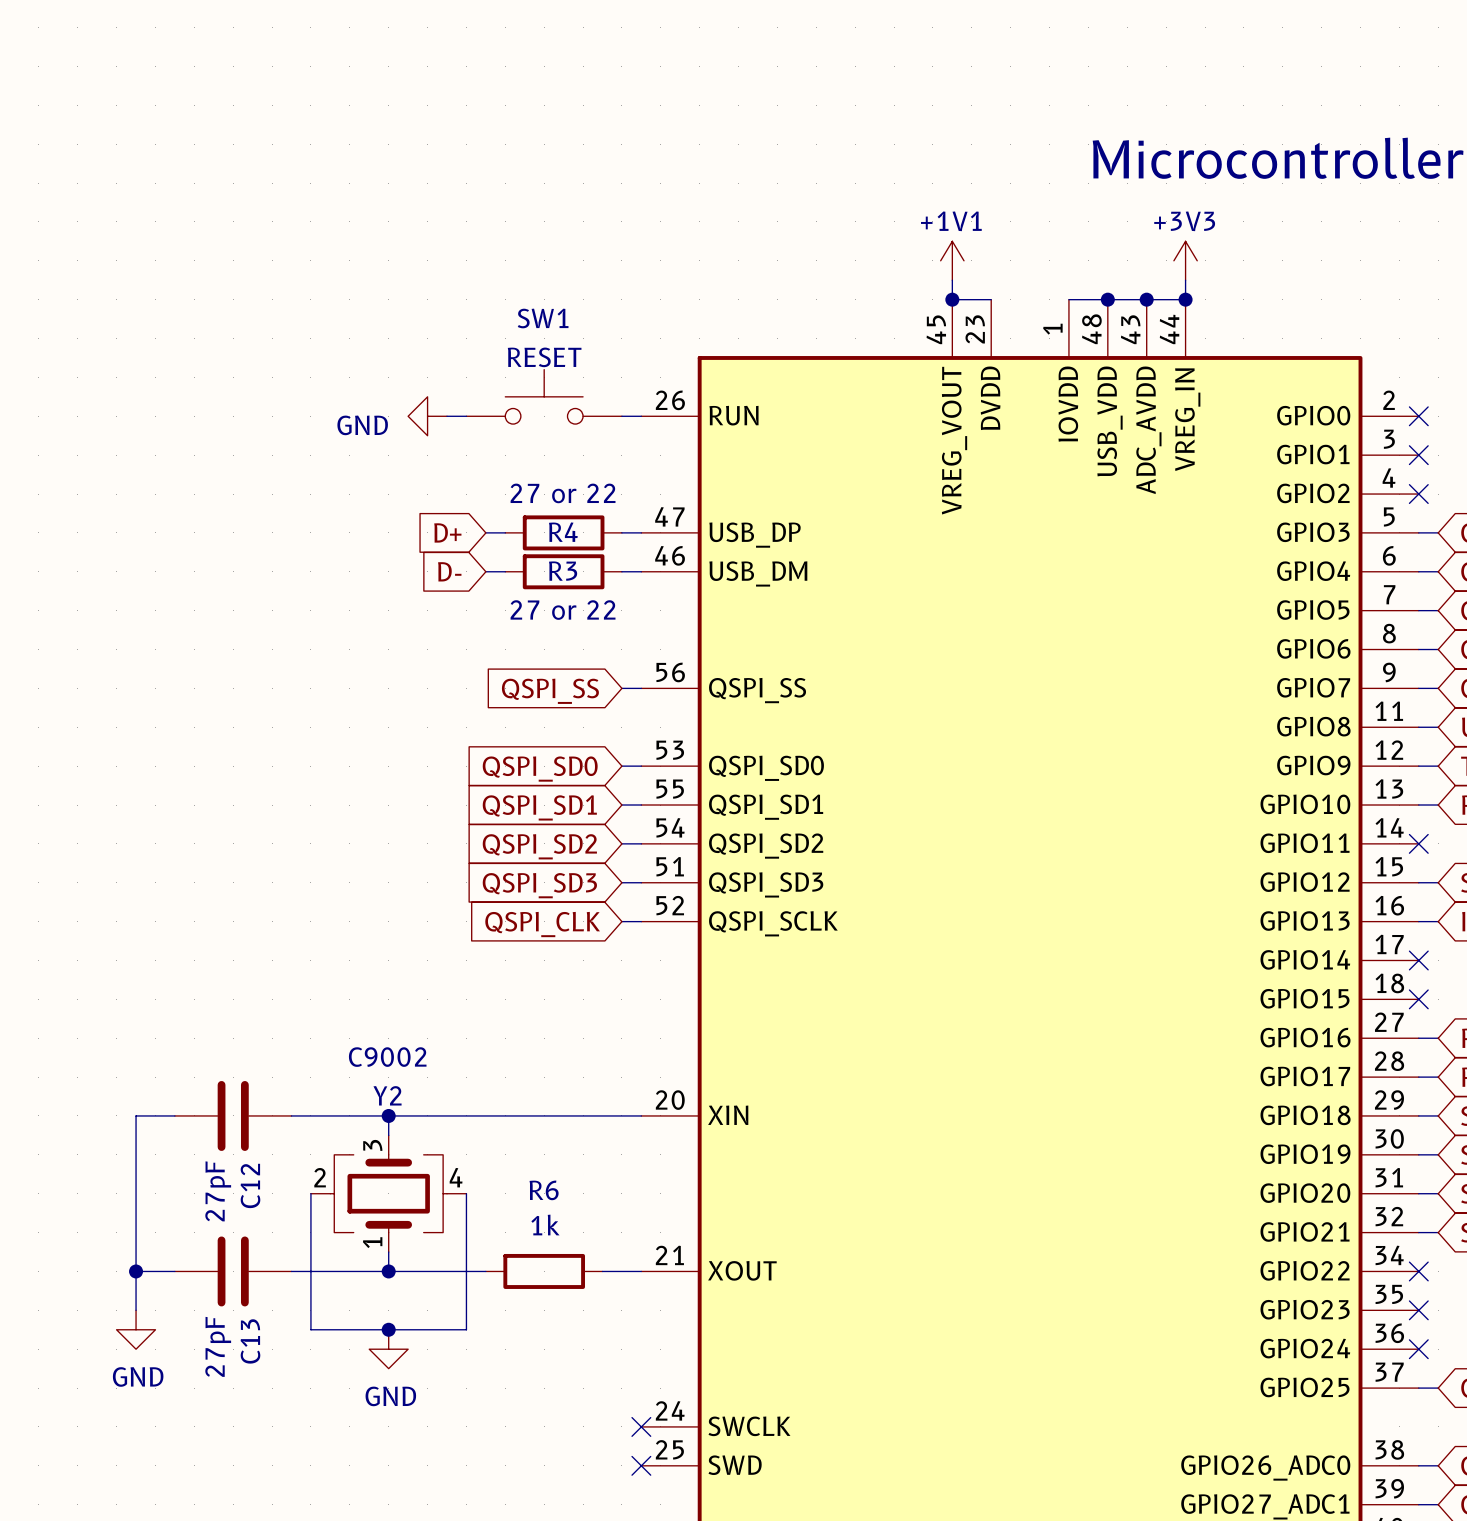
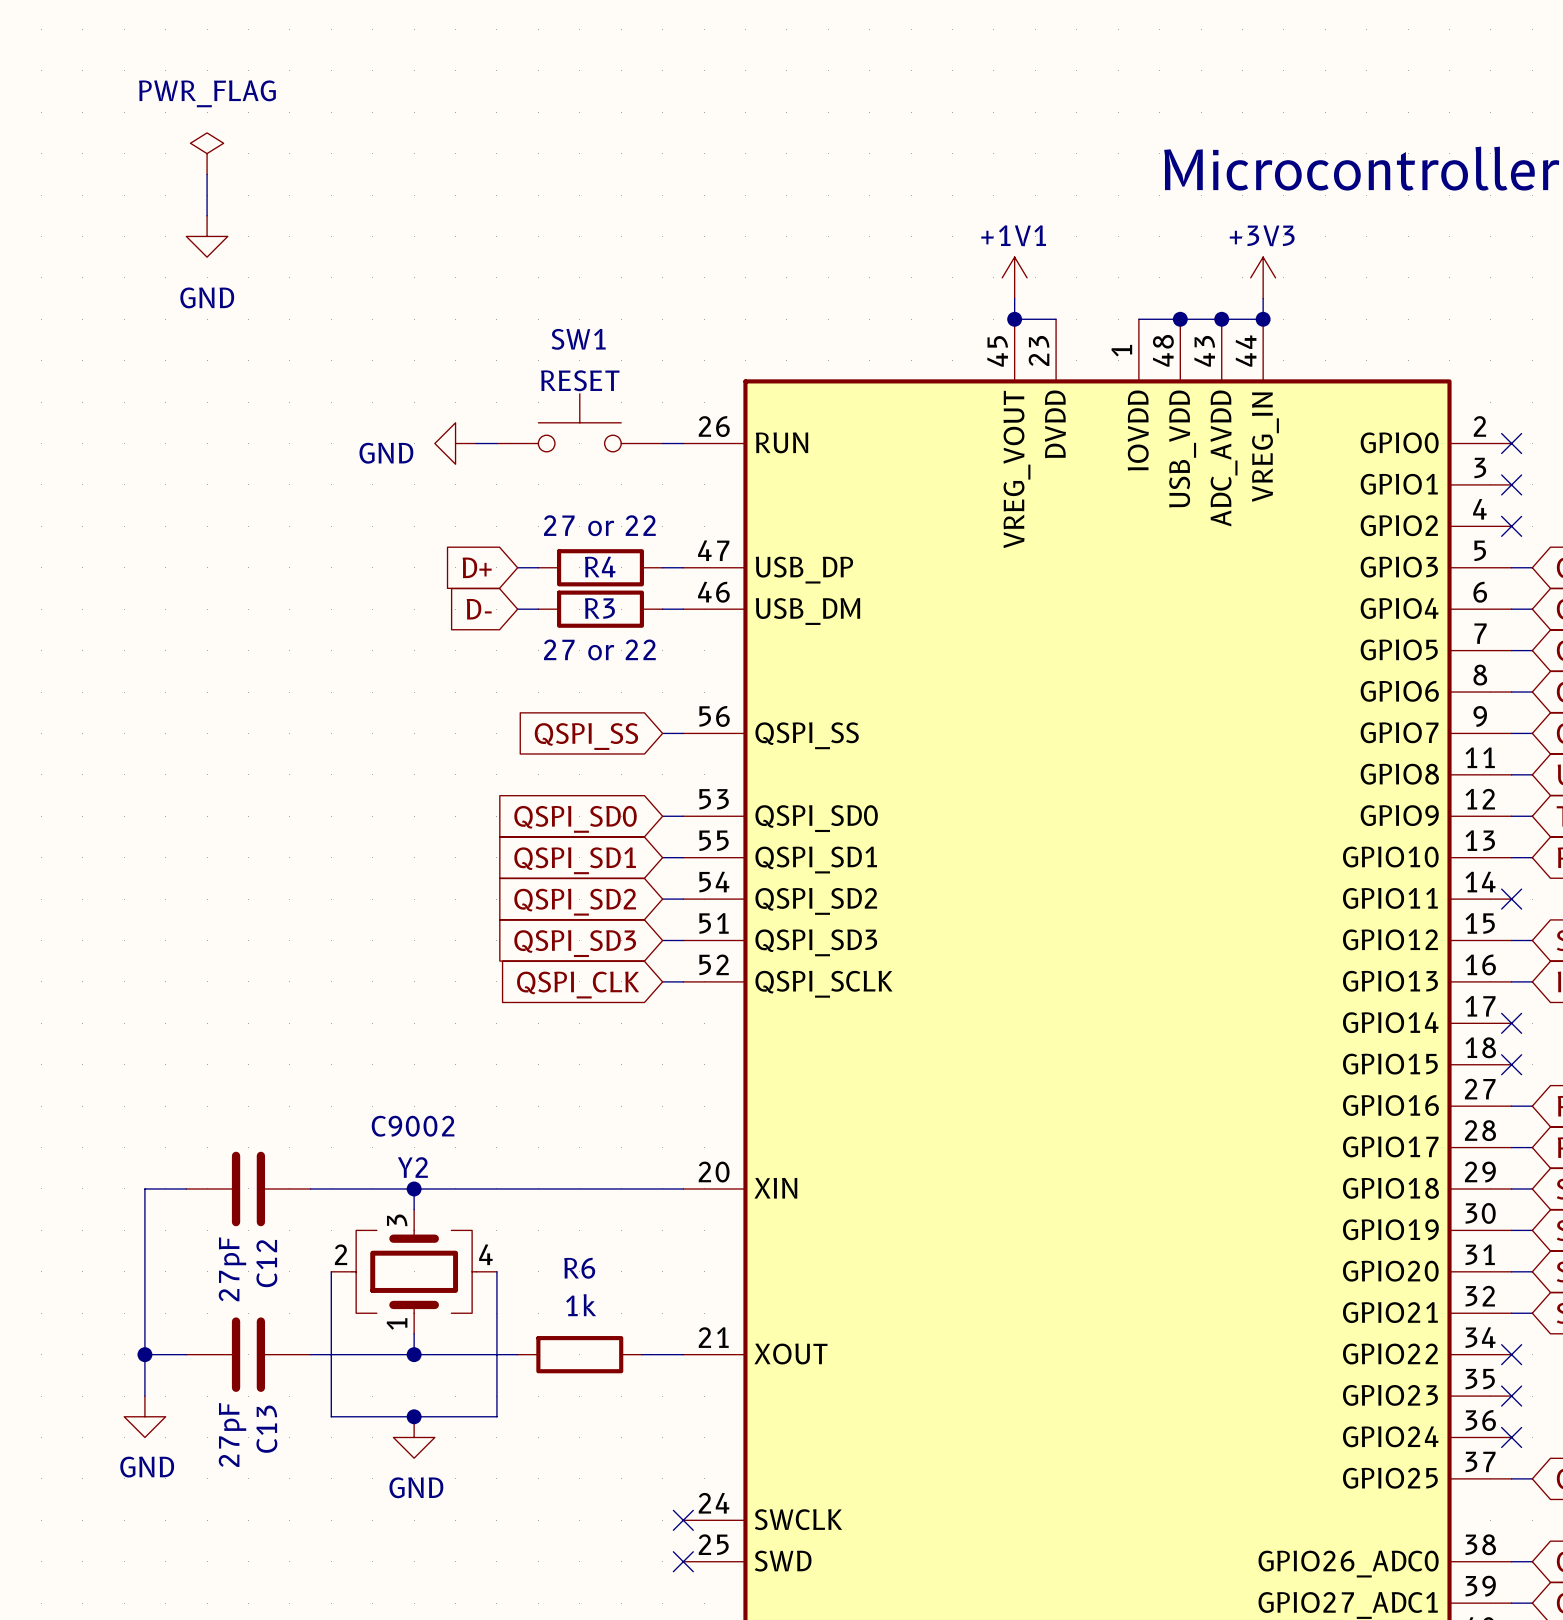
power symbol: none -> PWR_FLAG (207, 153)
wire: none -> (207, 174) (207, 215)
power symbol: none -> GND (207, 236)

